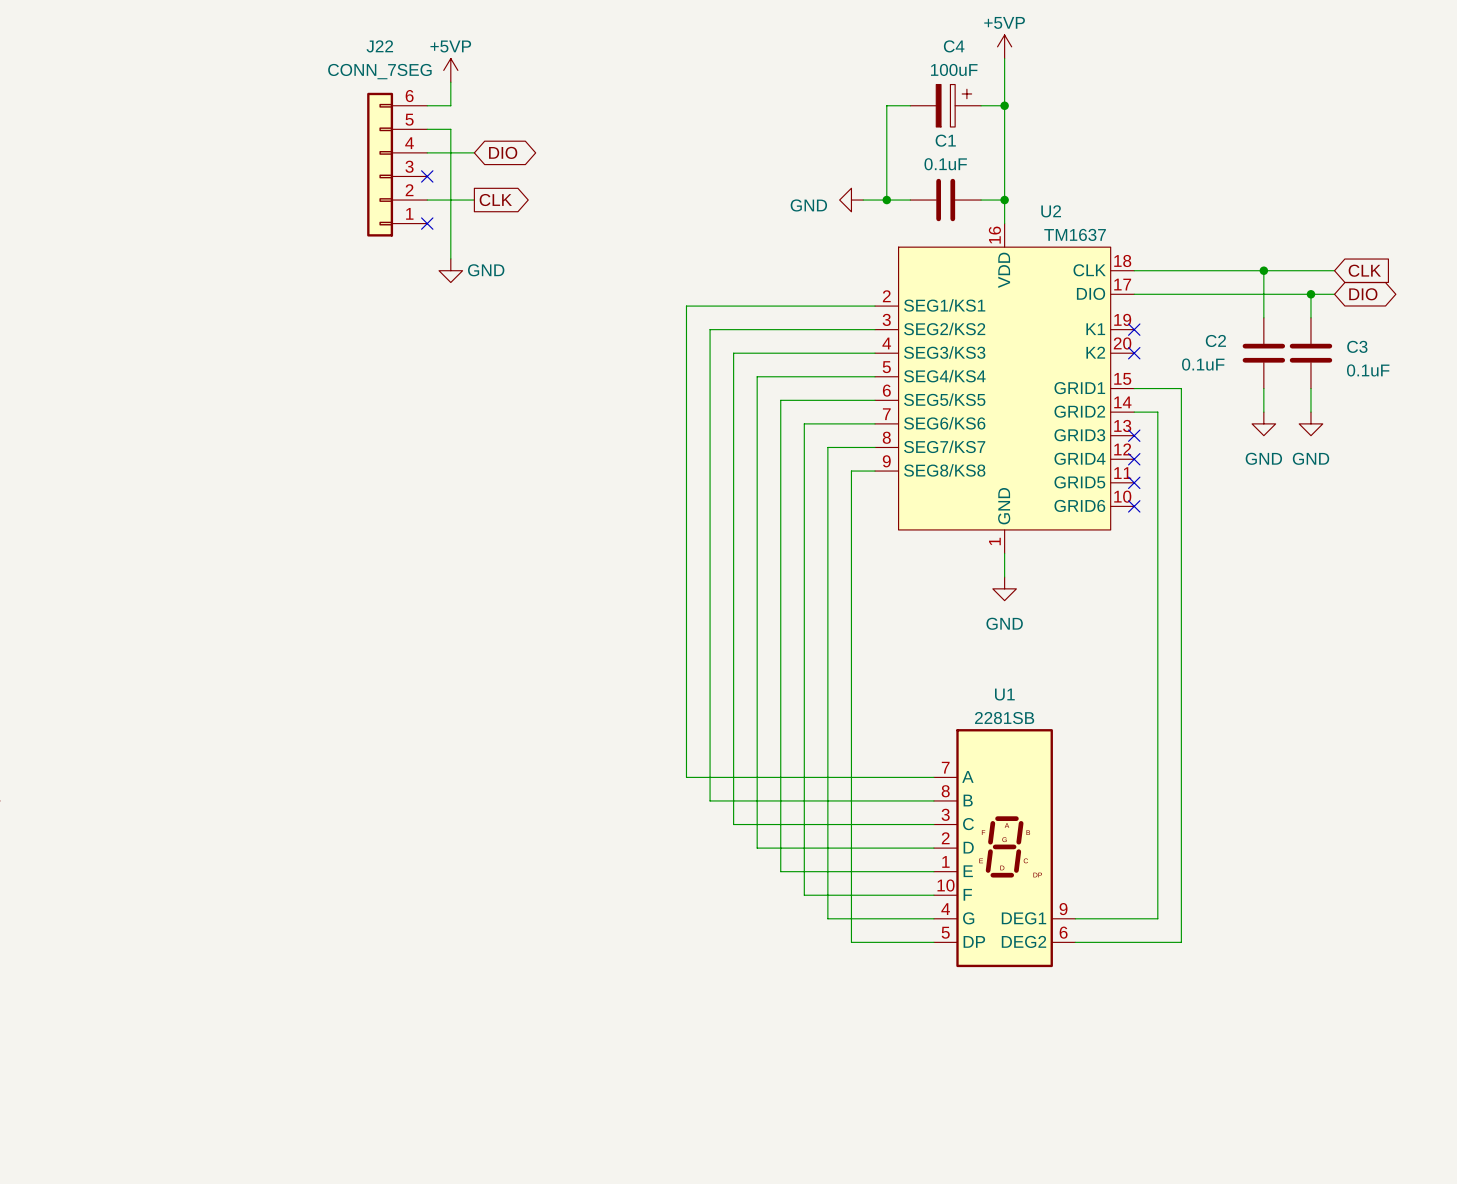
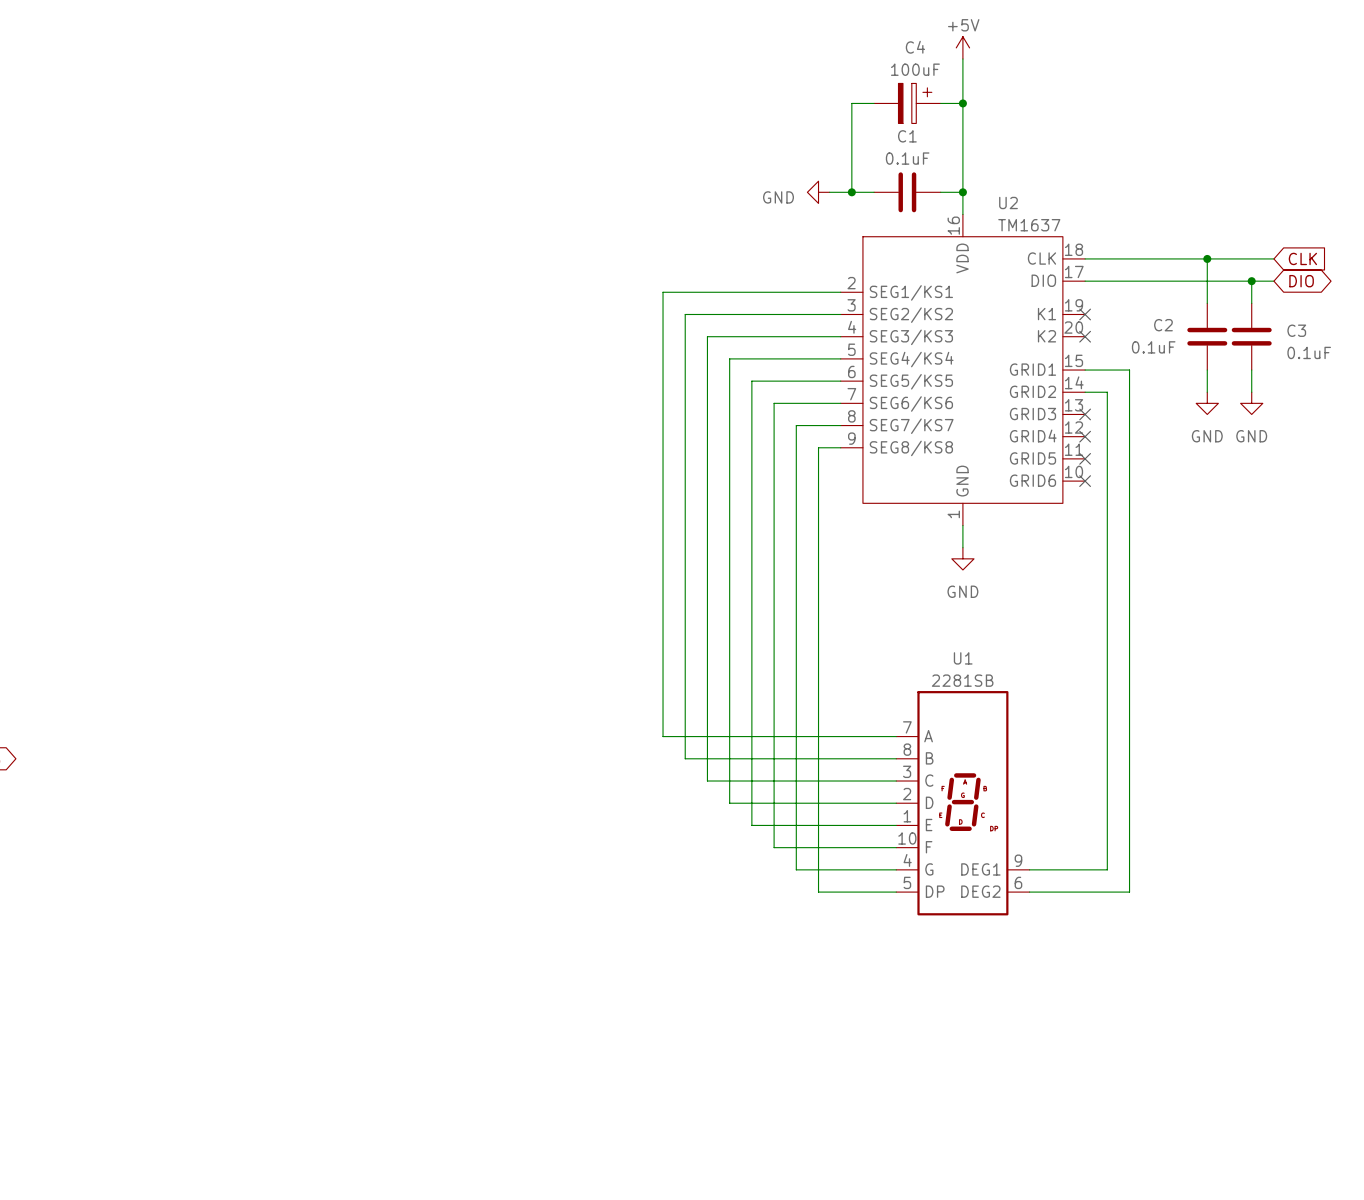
power symbol: +5VP (1004, 46) -> +5V (962, 47)
power symbol: +5VP (450, 70) -> none
wire: (450, 82) (450, 105) (427, 105) -> none
wire: (427, 129) (450, 129) (450, 258) -> none
wire: (427, 152) (474, 152) -> none
global label: DIO (503, 152) -> none
J22: CONN_7SEG (397, 164) -> none
no-connect mark: (427, 176) -> none
wire: (427, 200) (474, 200) -> none
global label: CLK (495, 200) -> none
no-connect mark: (427, 223) -> none
power symbol: GND (450, 270) -> none

